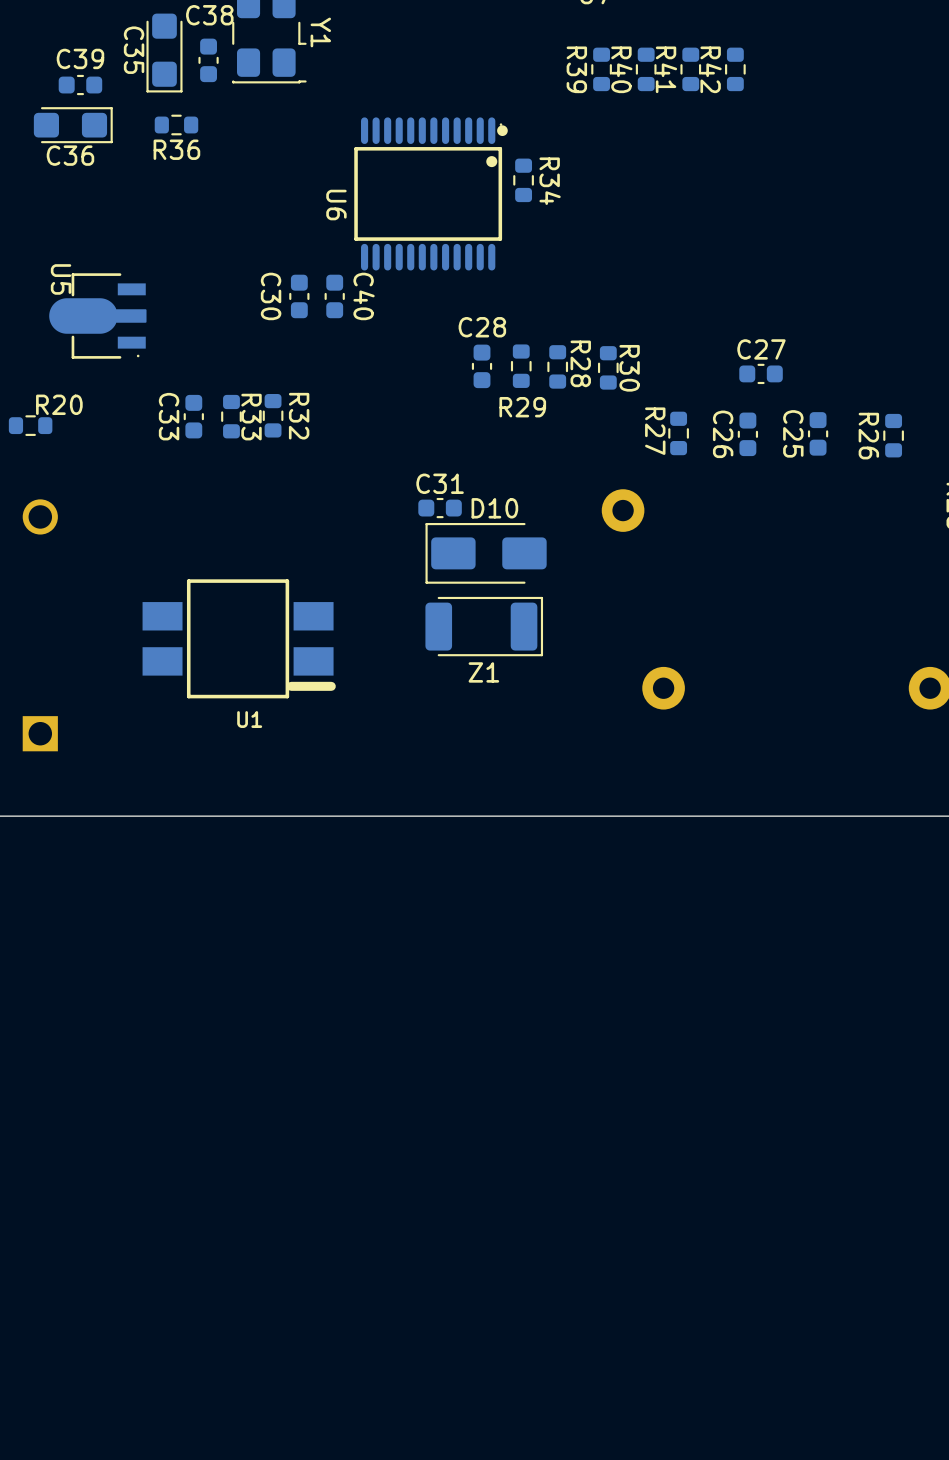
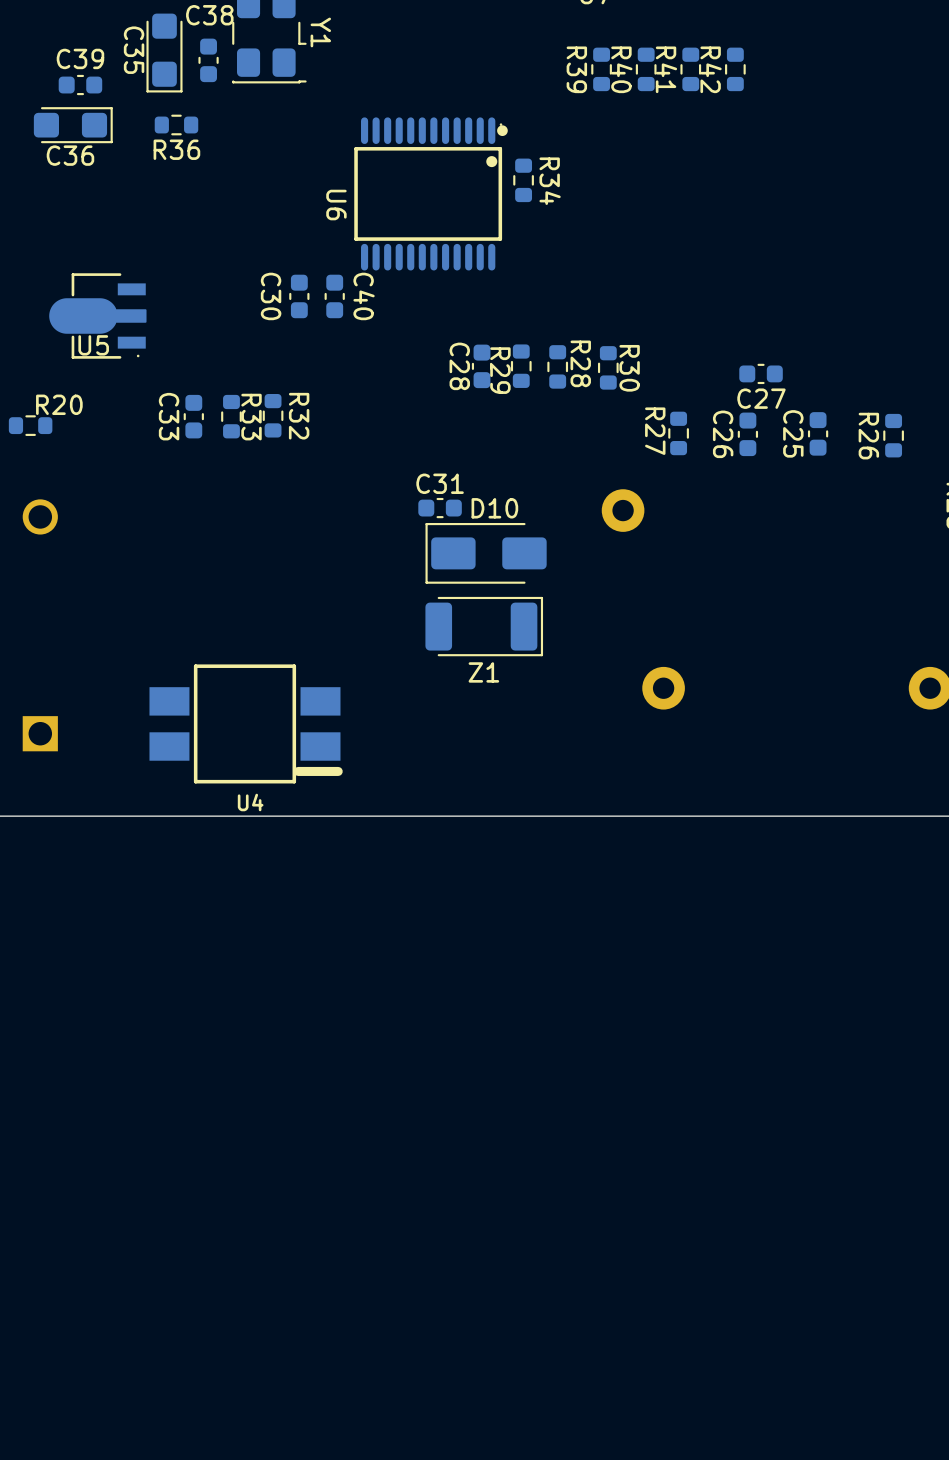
U5 name rotation: 0° (61, 279) -> 90° counterclockwise (93, 345)
U5 name position: U5 (61, 279) -> U5 (93, 345)
C28 name rotation: 0° (482, 327) -> 90° clockwise (459, 366)
C27 name position: C27 (761, 349) -> C27 (761, 398)
R29 name rotation: 0° (522, 407) -> 90° clockwise (500, 370)
U1: (239, 638) -> none
U4: none -> (246, 723)

